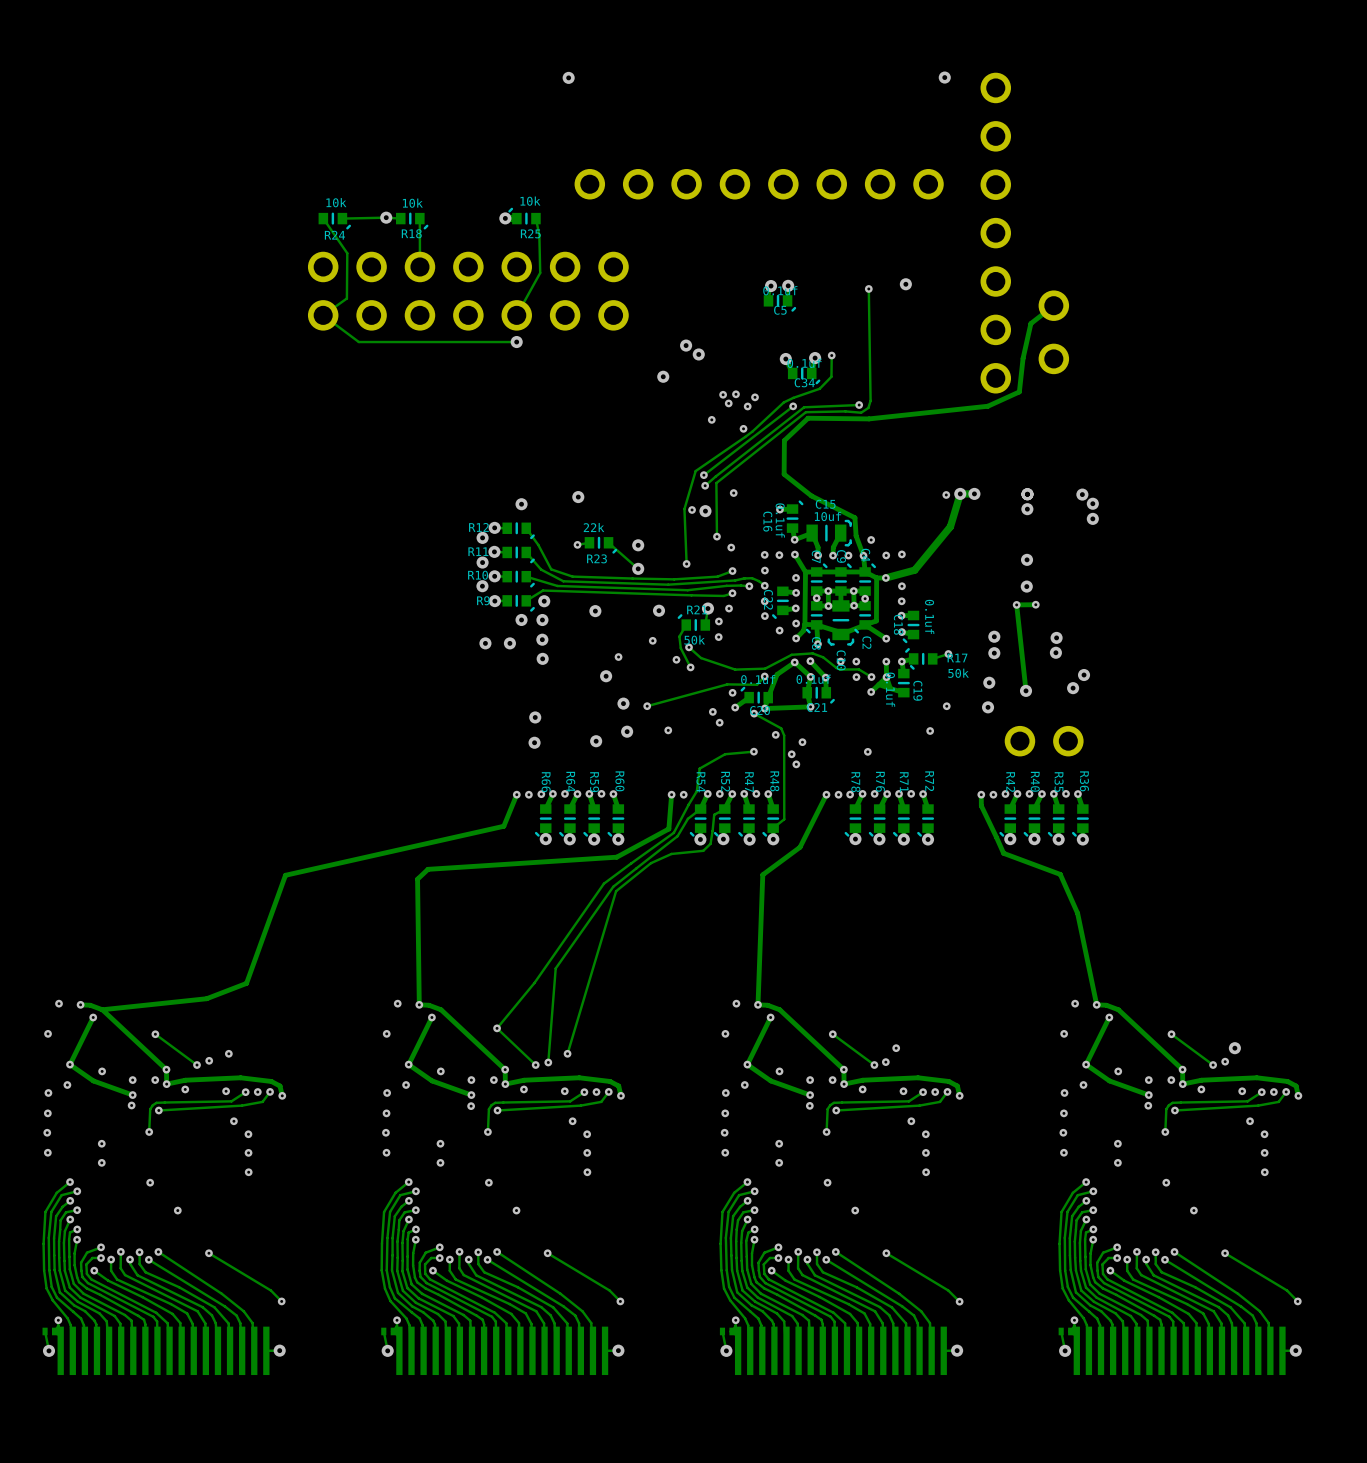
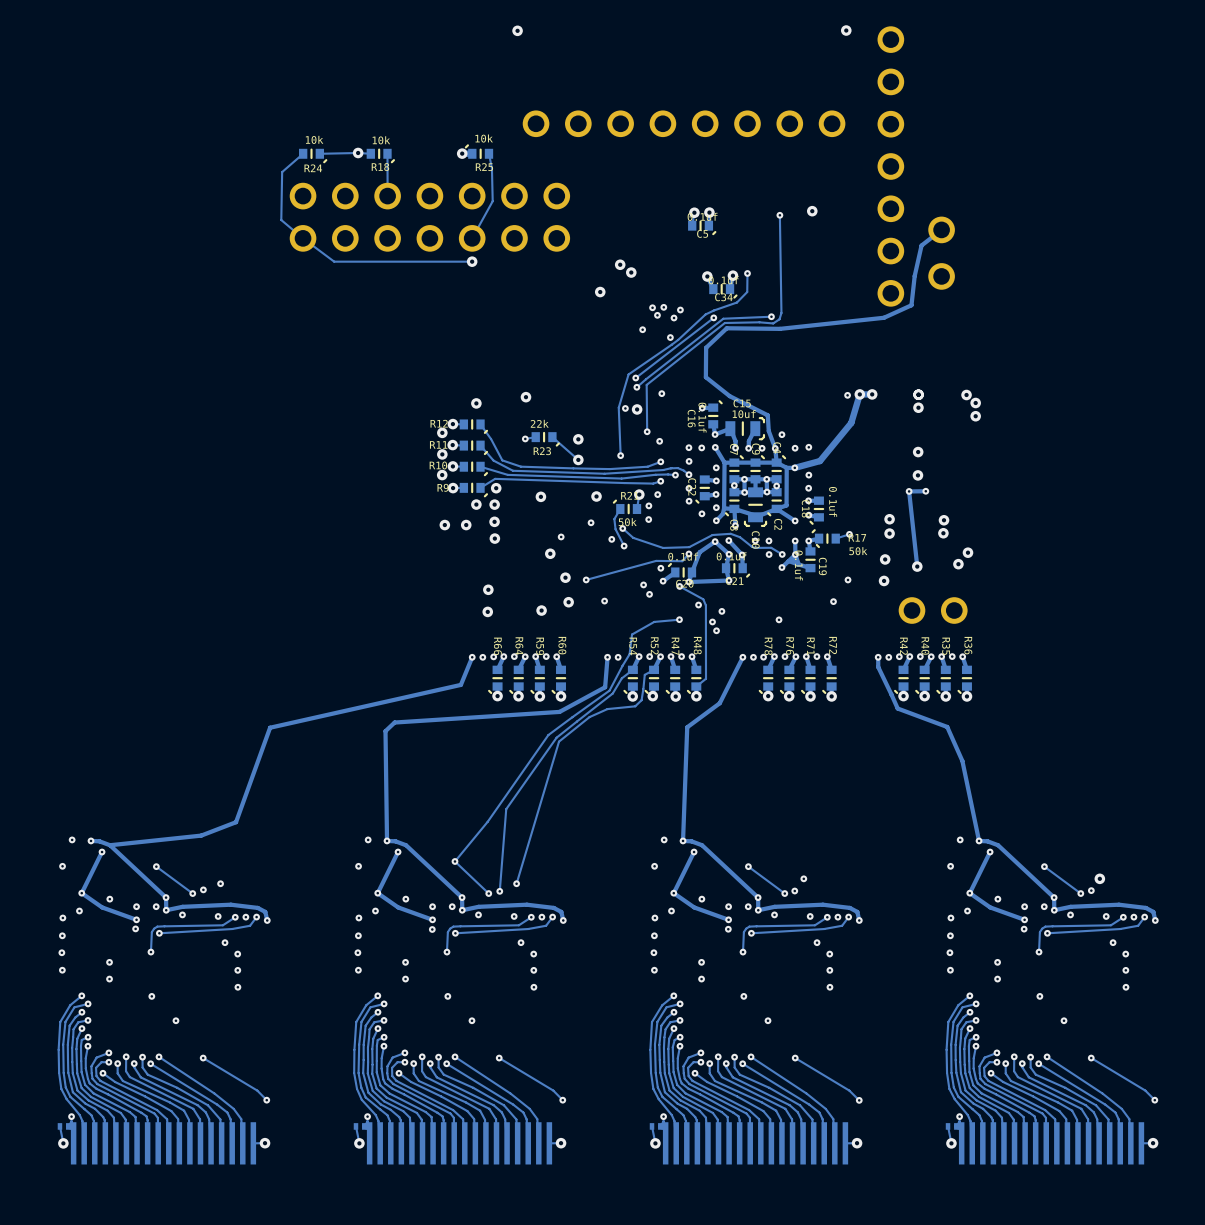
track: (323, 218) (347, 253) (346, 298) (323, 315) -> (303, 153) (282, 172) (281, 220) (303, 238)

